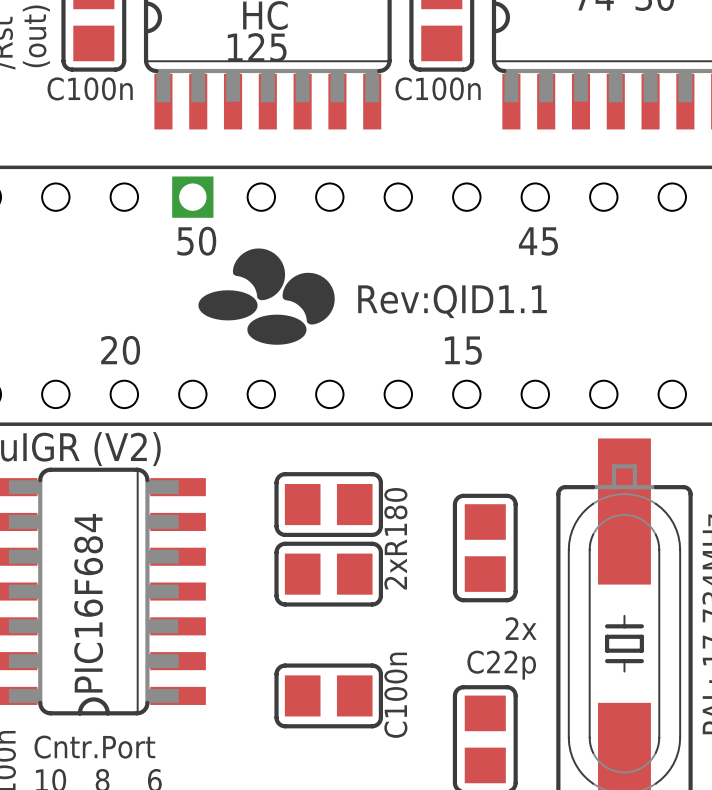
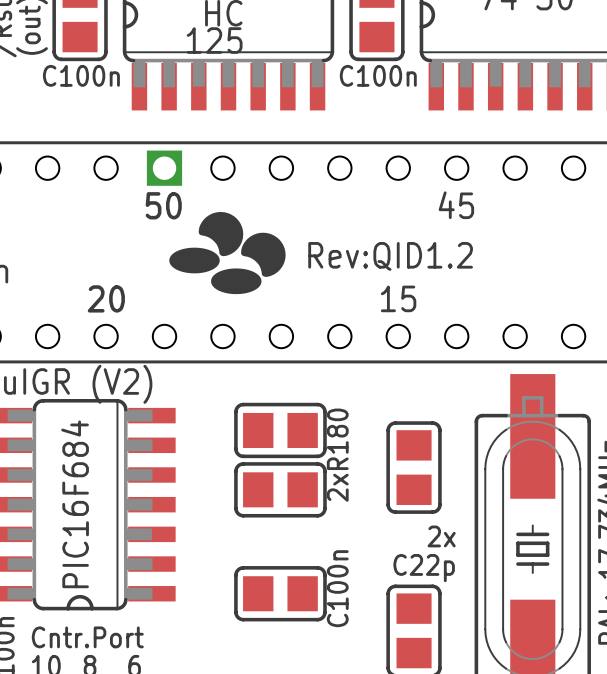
text: Rev:QID1.1 (452, 301) -> Rev:QID1.2 (390, 256)

